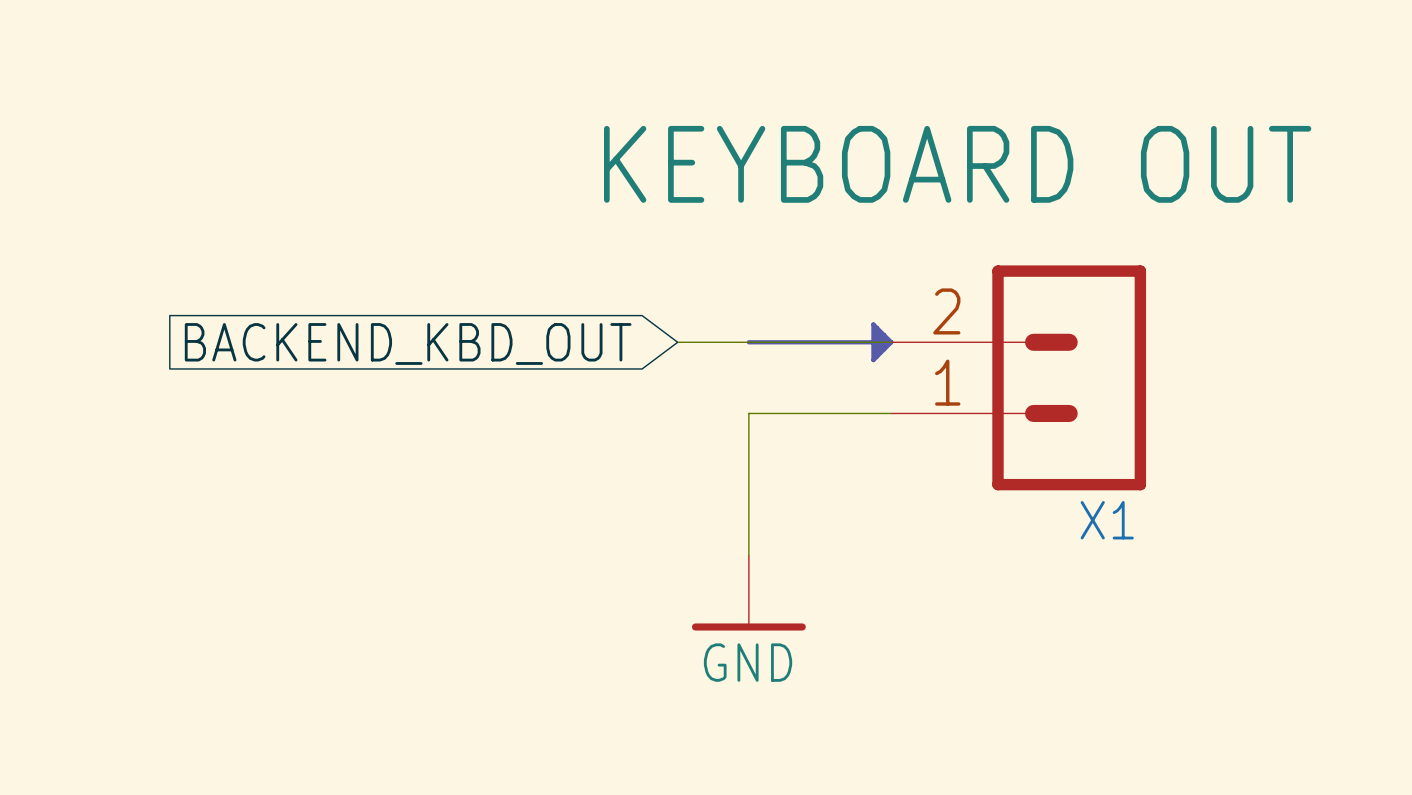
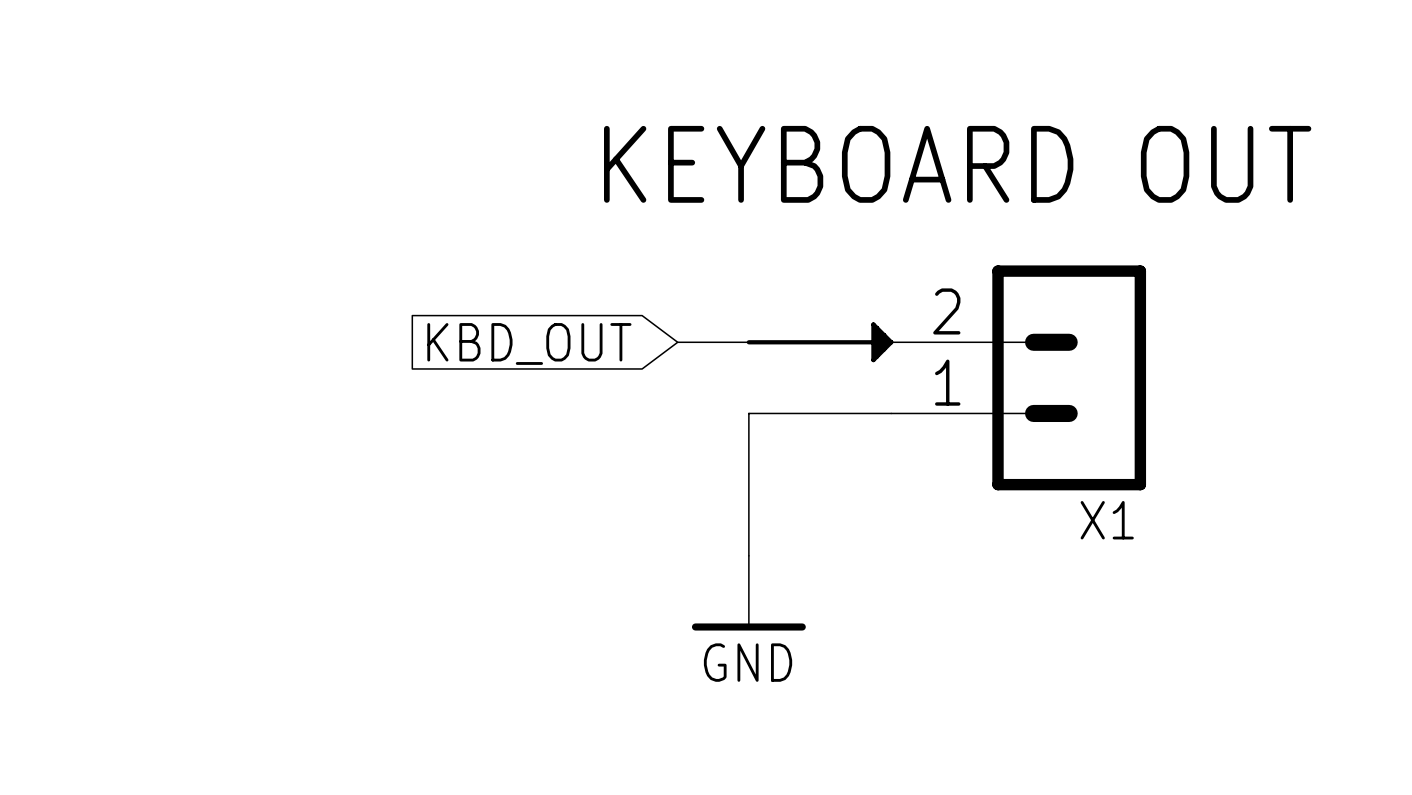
global label: BACKEND_KBD_OUT (408, 343) -> KBD_OUT (529, 343)

